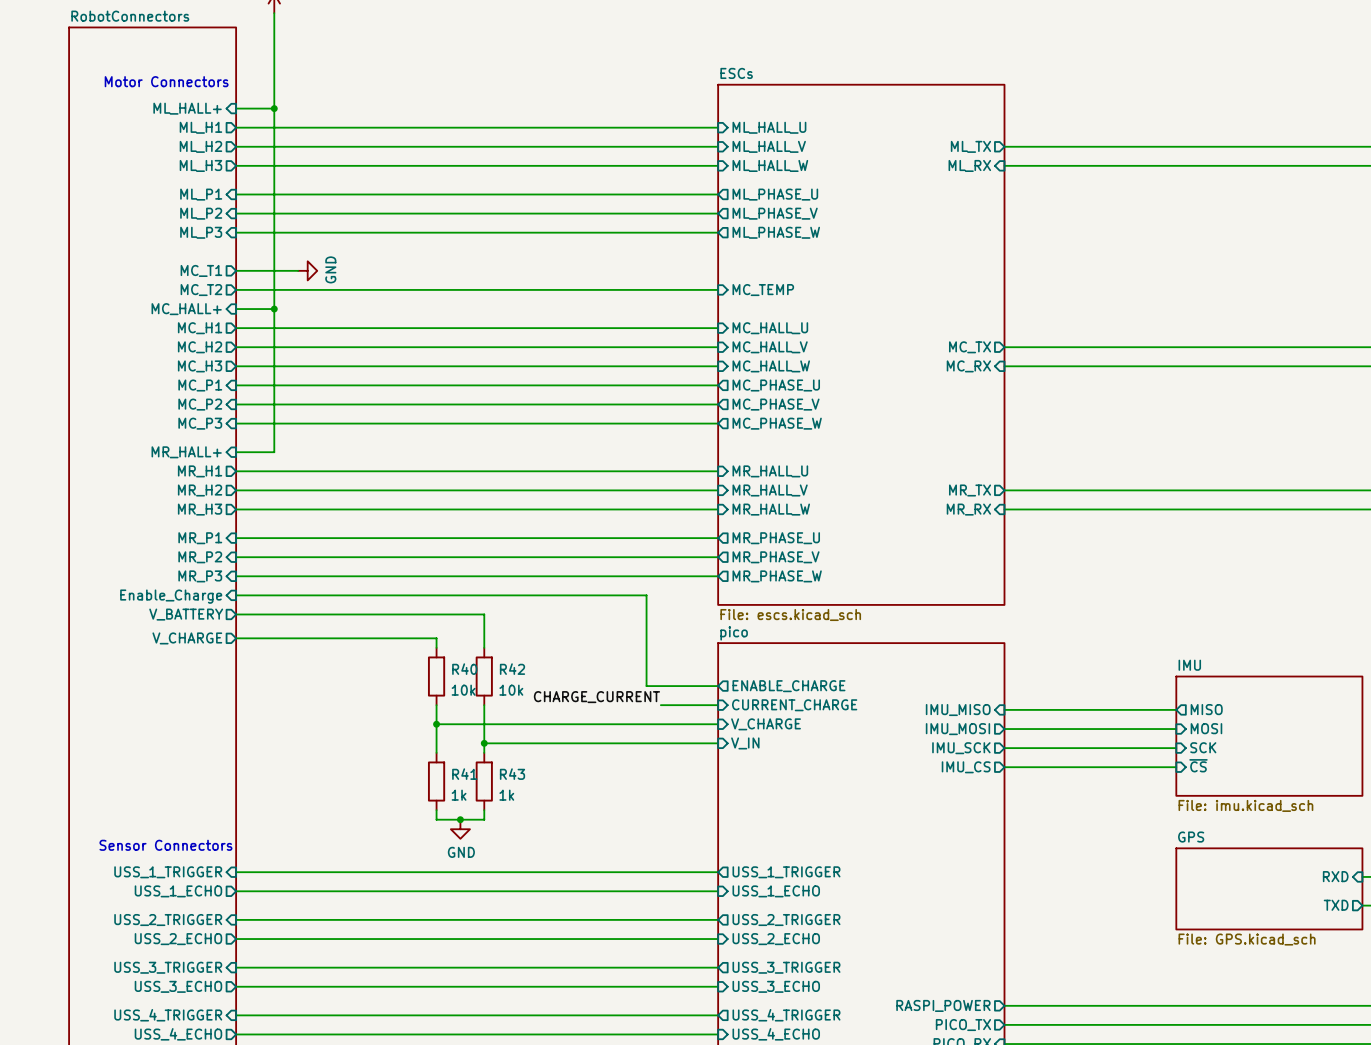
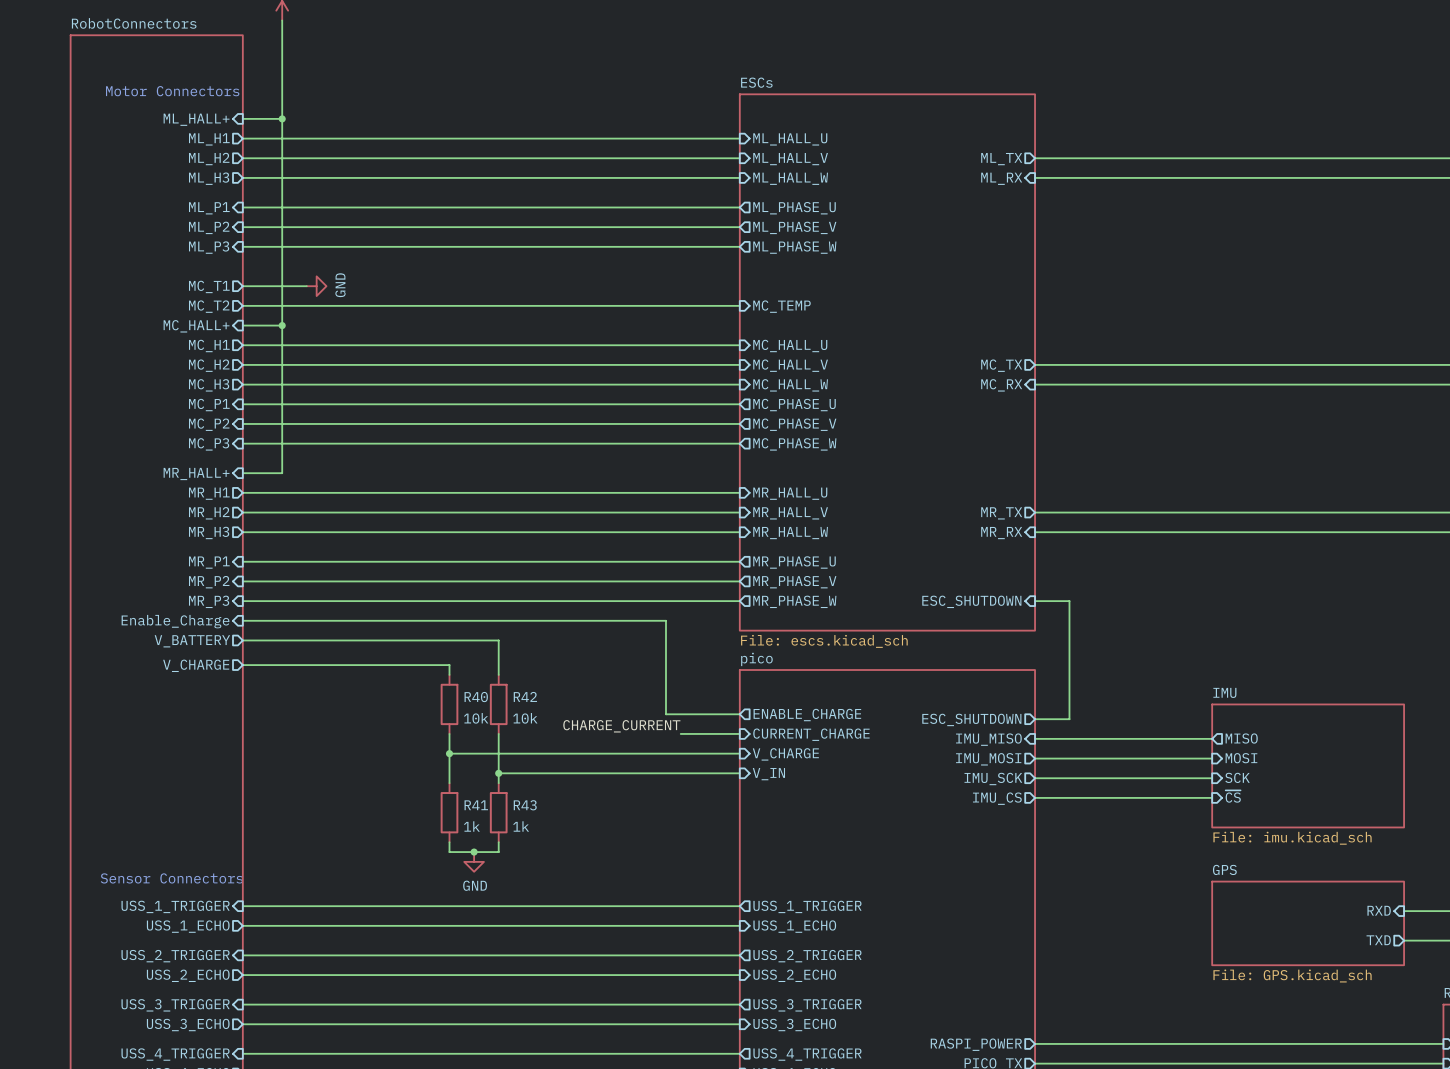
sheet pin: none -> ESC_SHUTDOWN (971, 601)
wire: none -> (1035, 601) (1069, 601) (1069, 719) (1035, 719)
sheet pin: none -> ESC_SHUTDOWN (971, 719)

